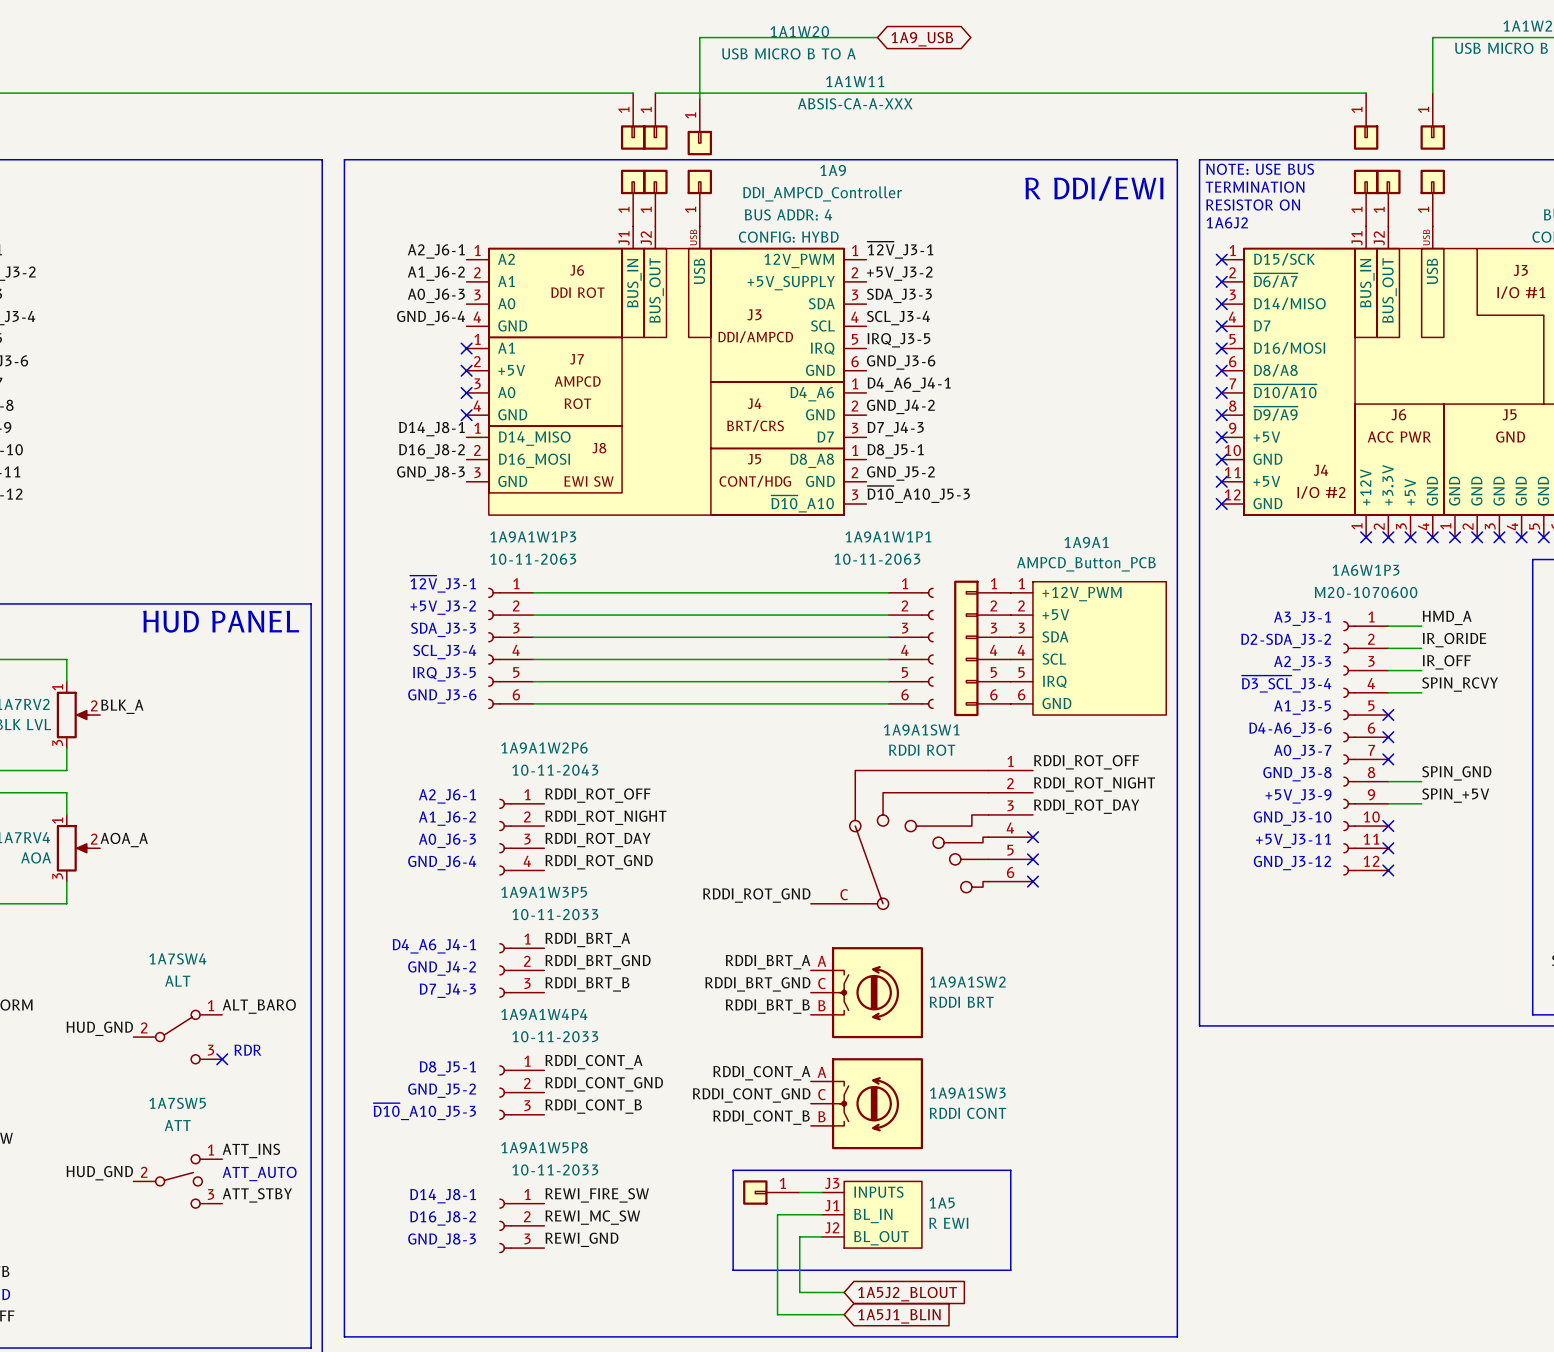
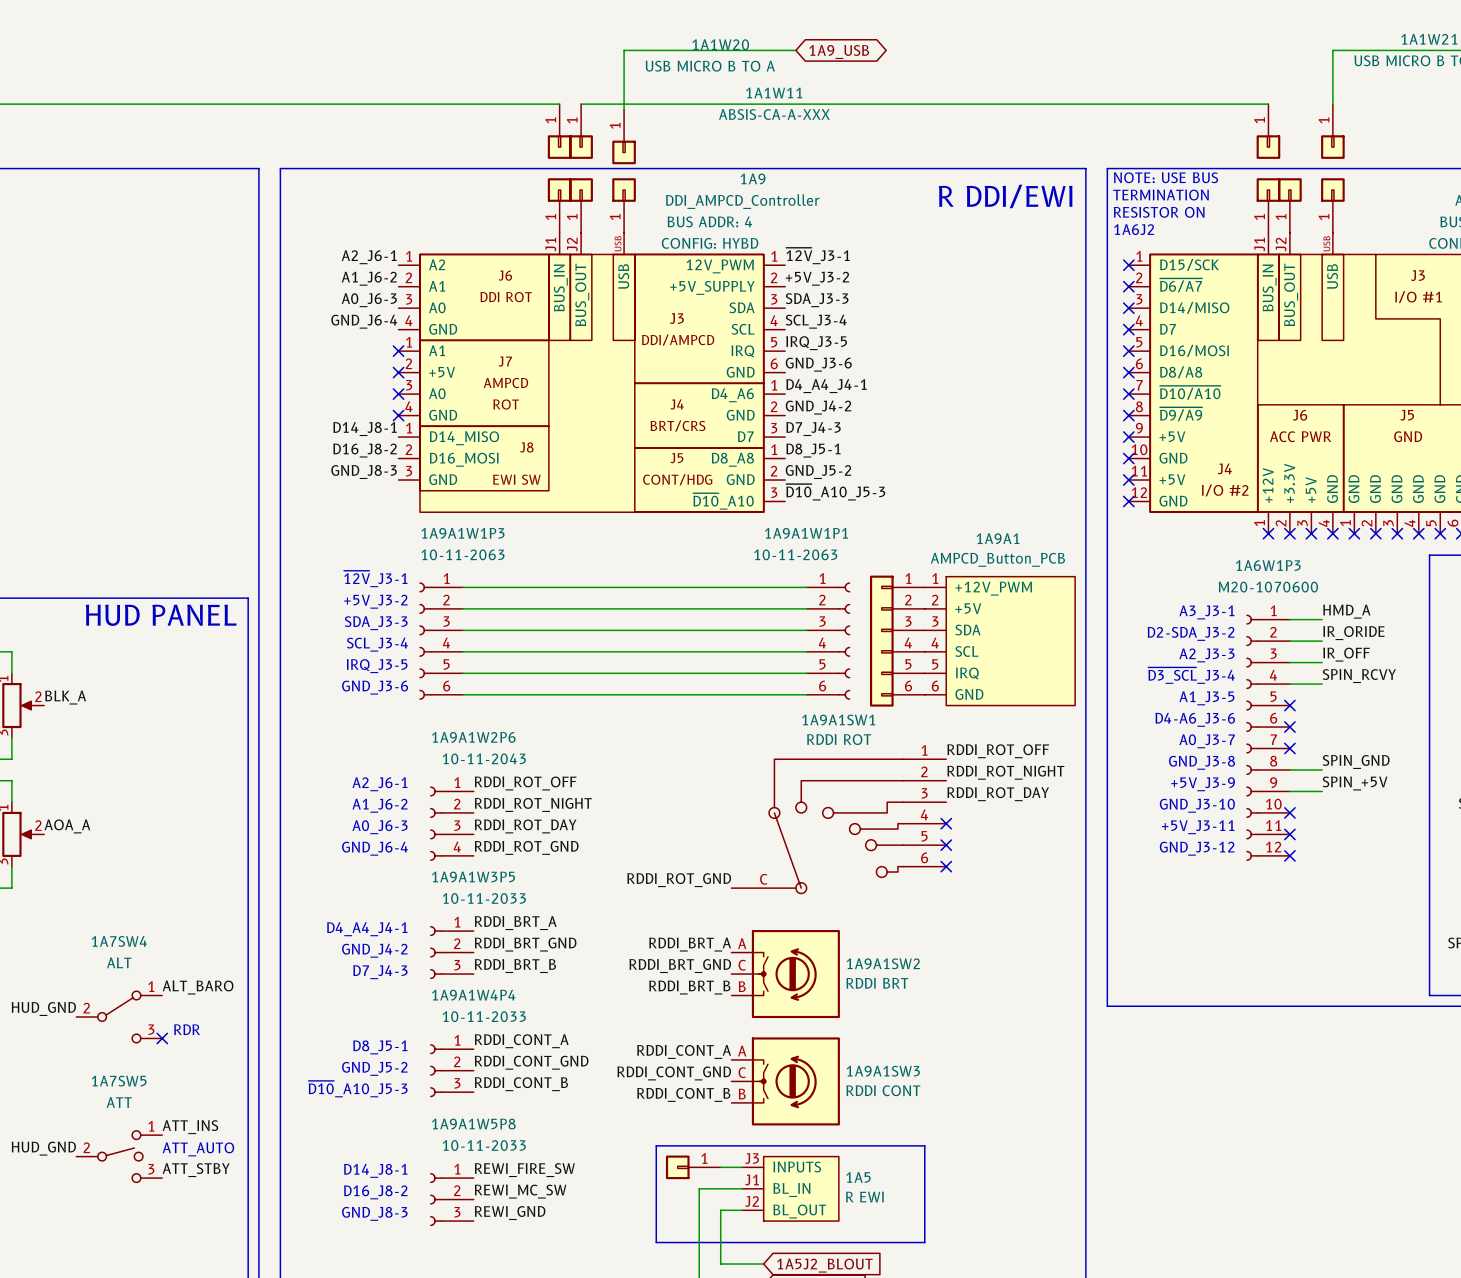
label: D4_A6_J4-1 (909, 384) -> D4_A4_J4-1 (826, 386)
text: D4_A6_J4-1 (434, 946) -> D4_A4_J4-1 (367, 929)

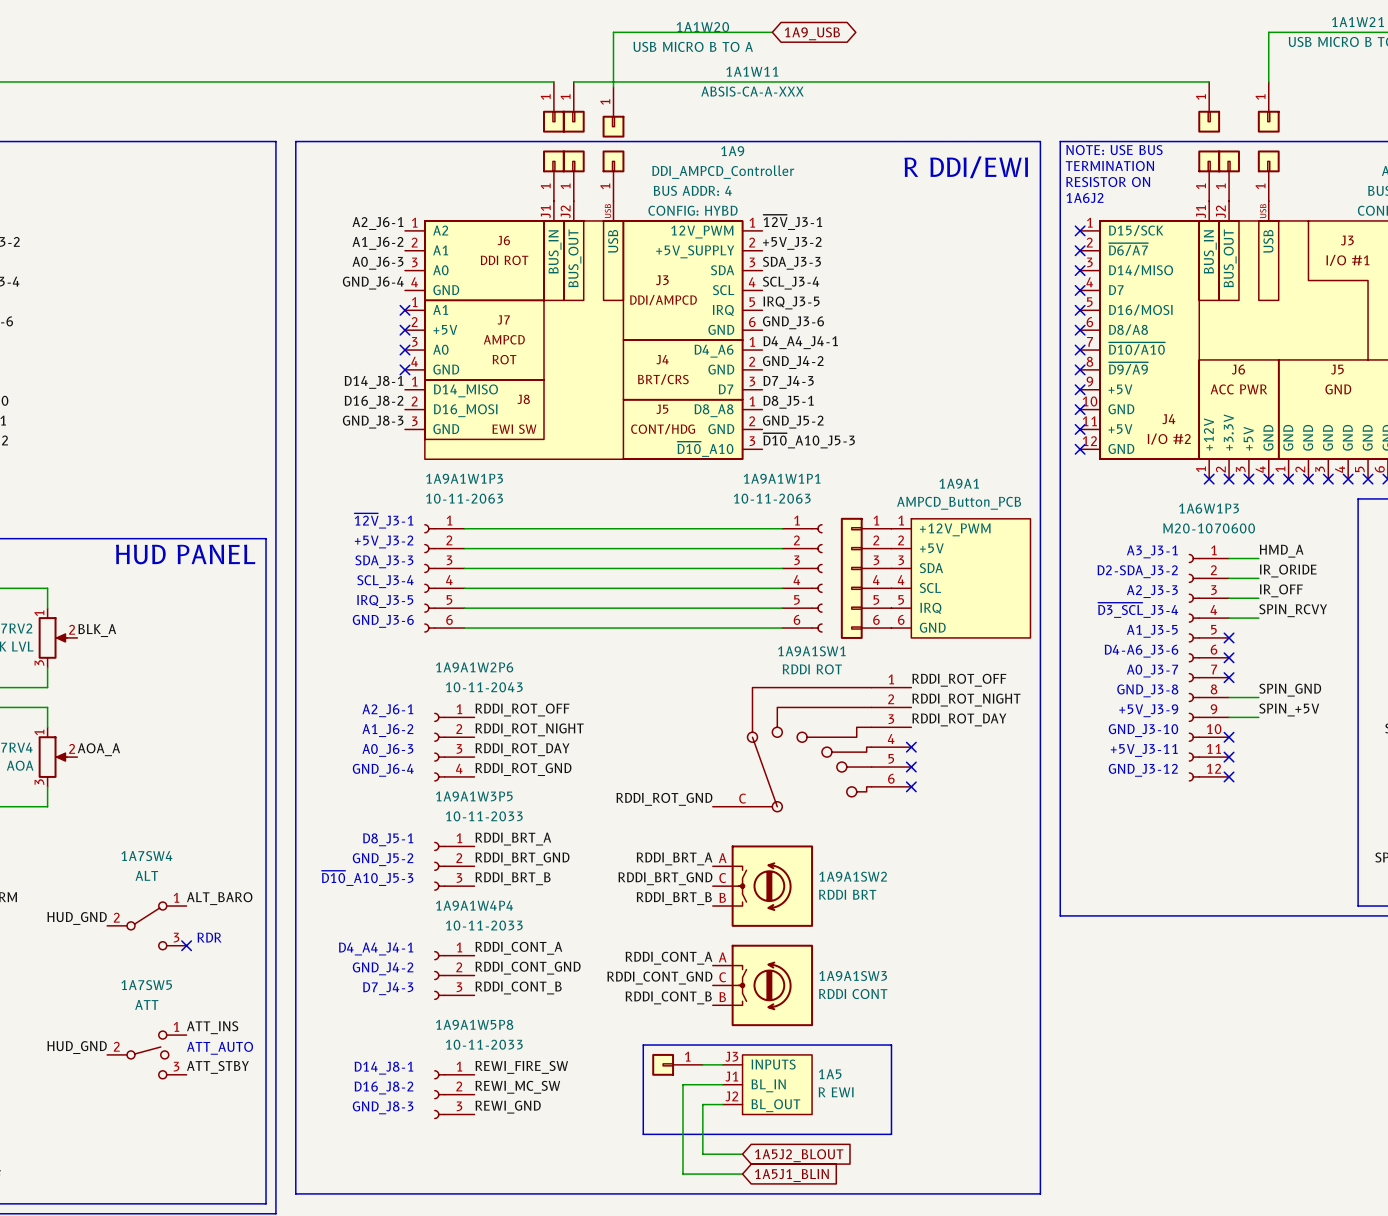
text: D4_A4_J4-1 (367, 929) -> D8_J5-1 (388, 839)
text: GND_J4-2 (374, 950) -> GND_J5-2 (383, 859)
text: D7_J4-3 (380, 972) -> ~{D10}_A10_J5-3 (367, 878)
text: D8_J5-1 (380, 1047) -> D4_A4_J4-1 (376, 949)
text: GND_J5-2 (374, 1068) -> GND_J4-2 (383, 968)
text: ~{D10}_A10_J5-3 (358, 1089) -> D7_J4-3 (388, 988)

